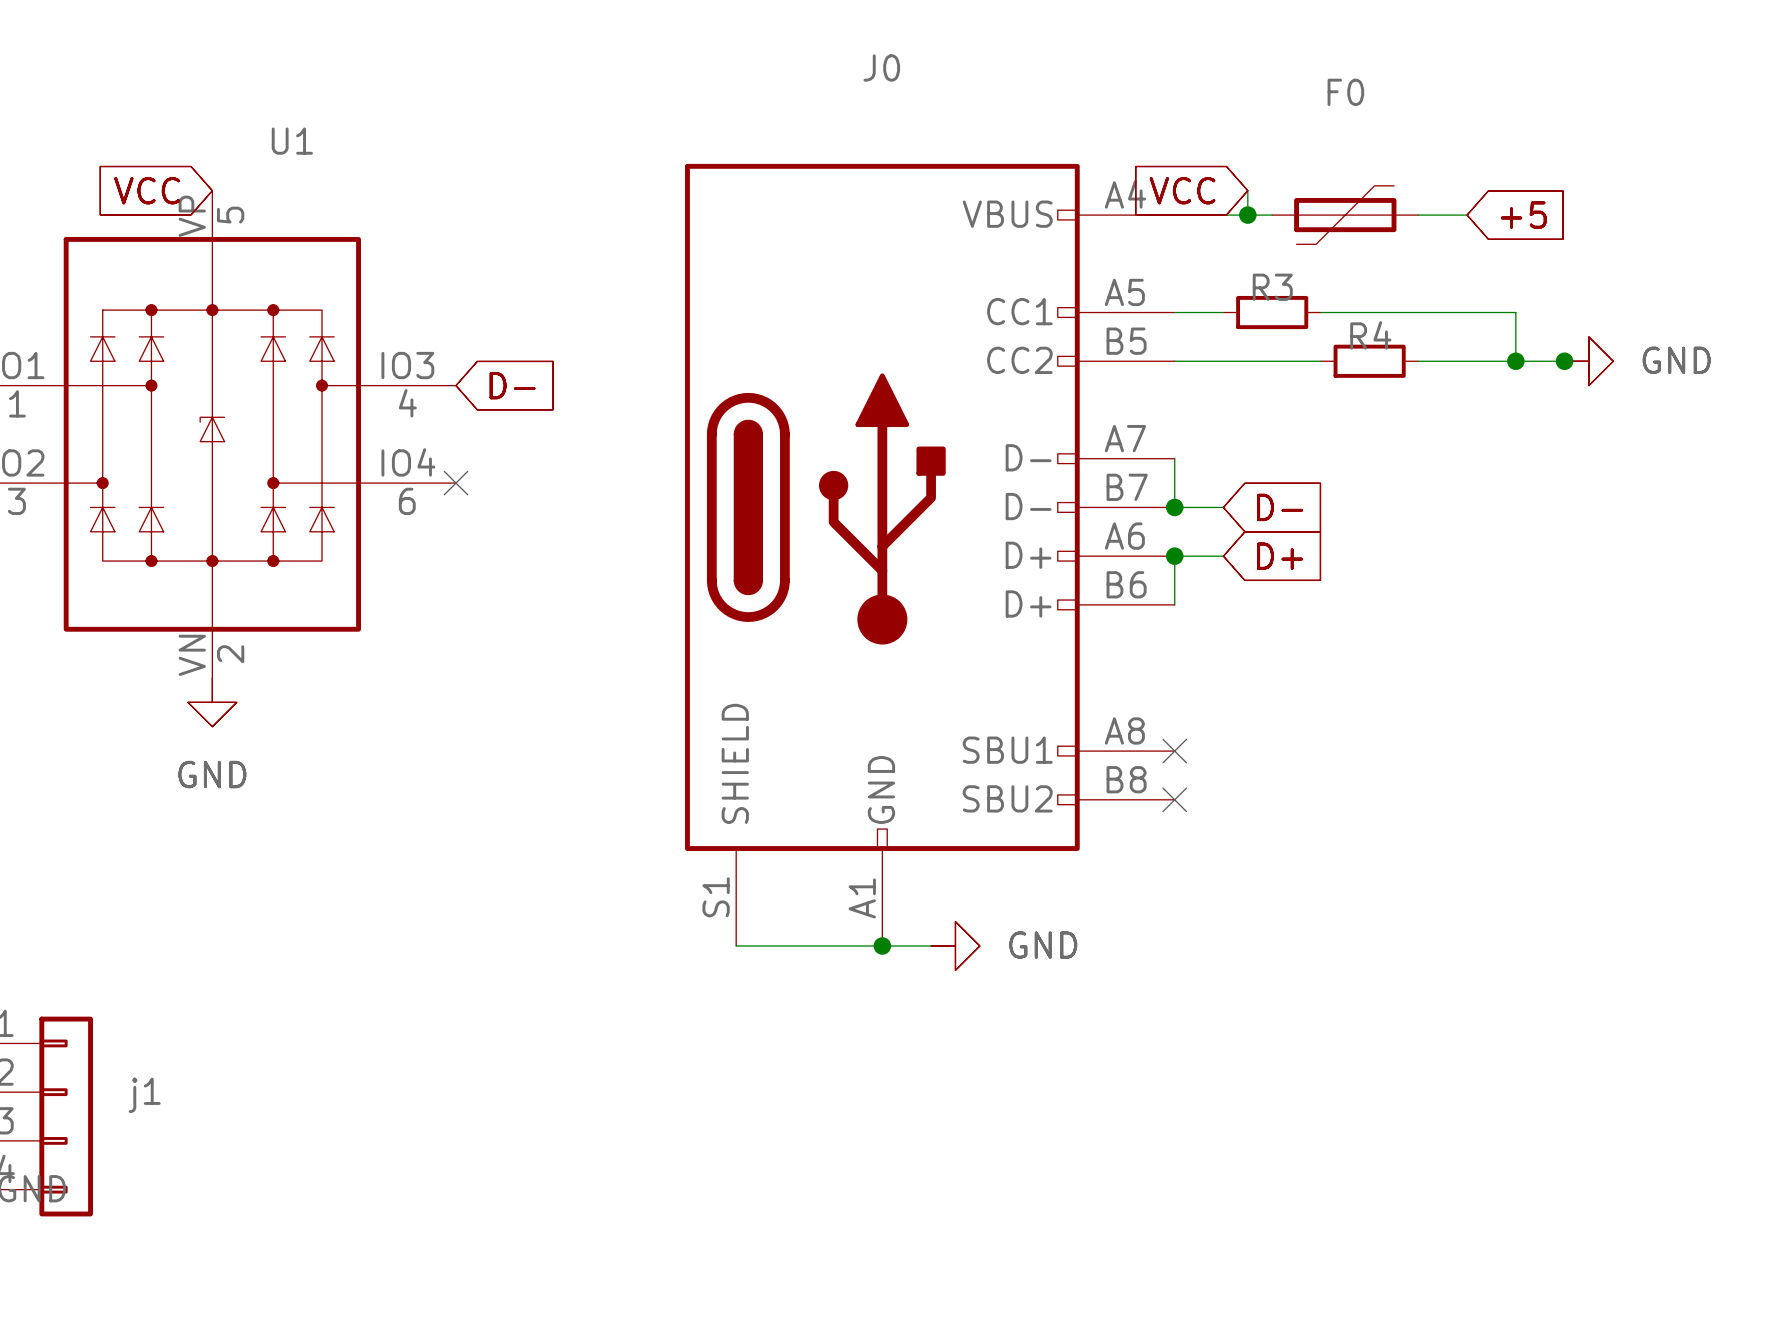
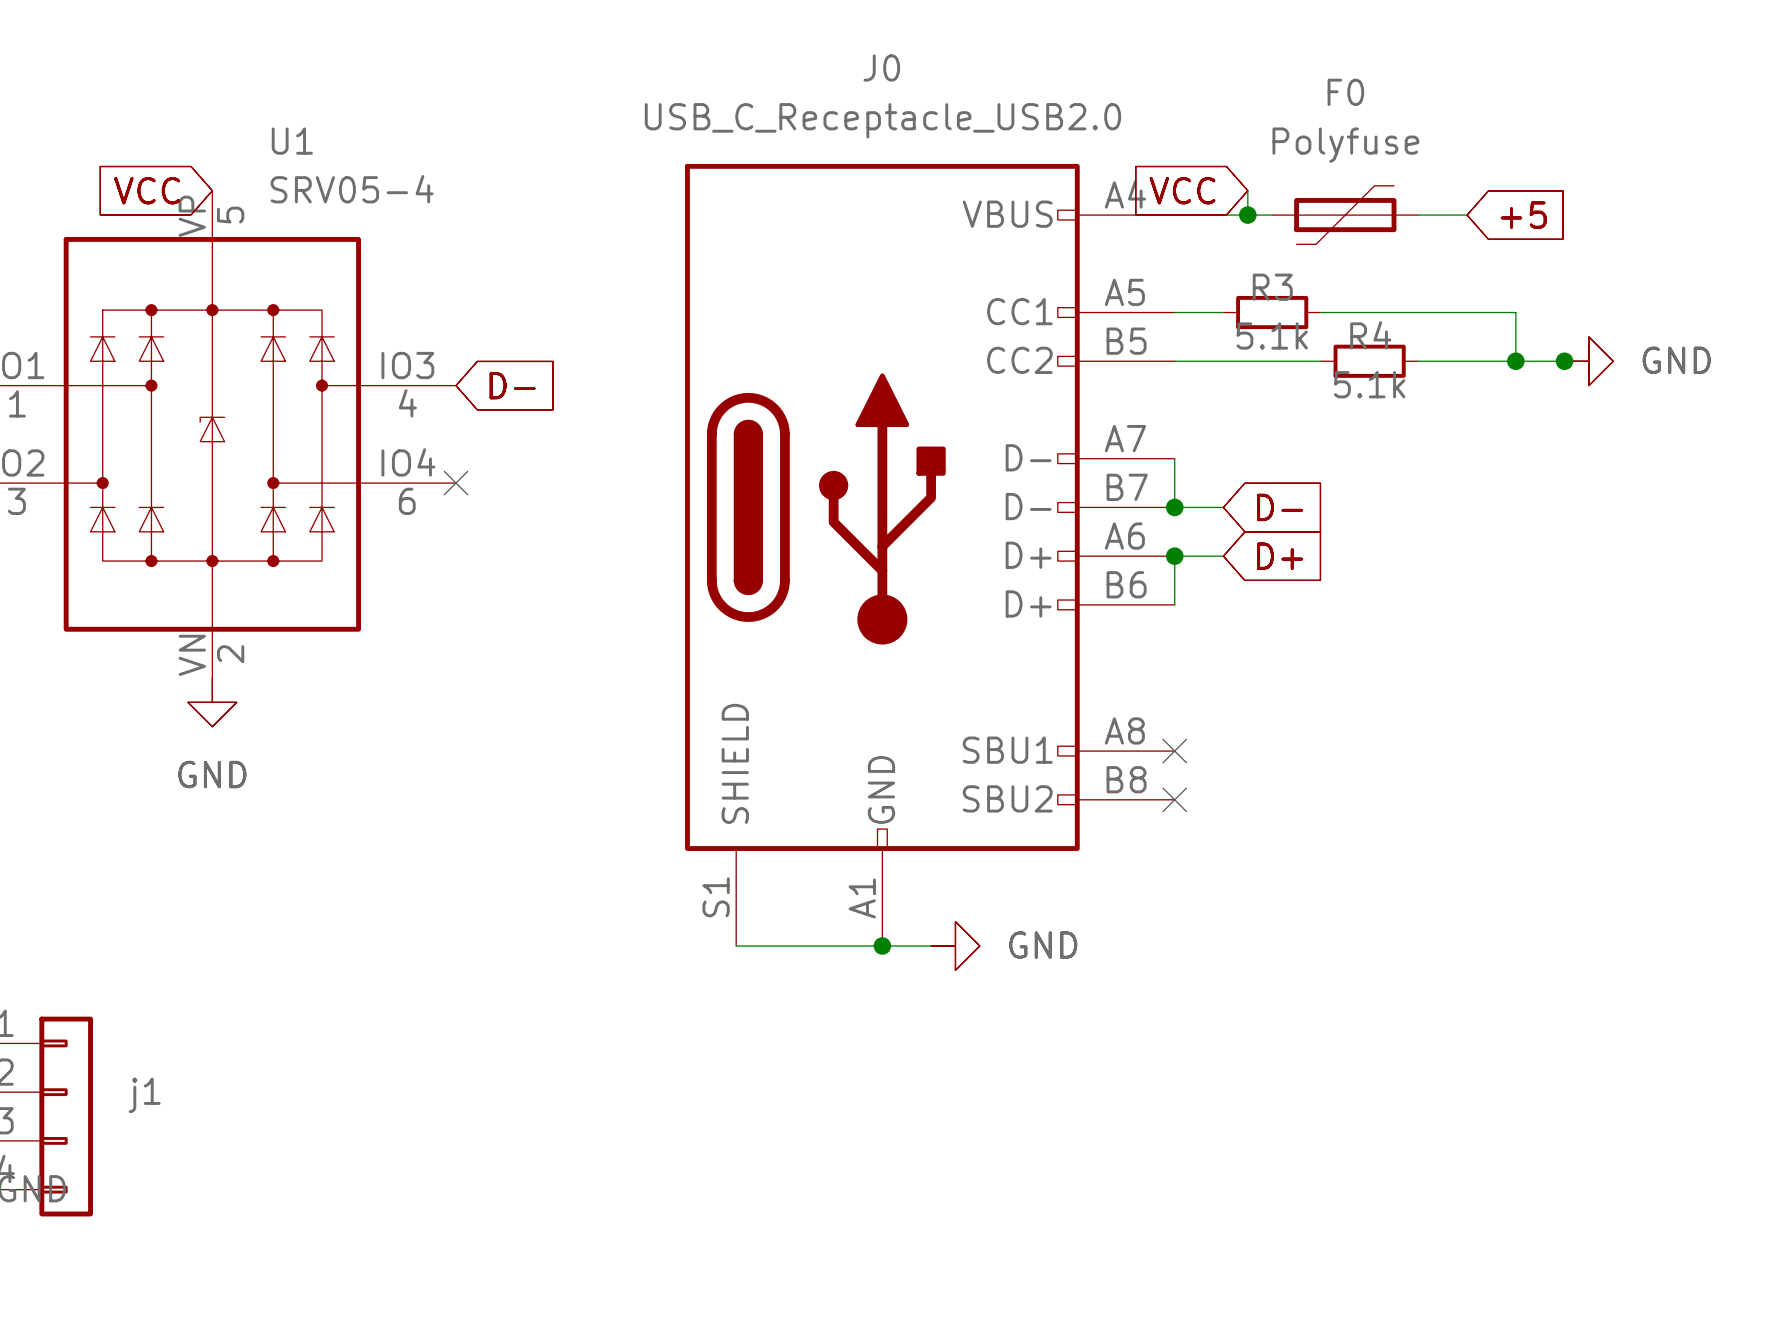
J0 value: none -> USB_C_Receptacle_USB2.0 (882, 120)
F0 value: none -> Polyfuse (1345, 145)
U1 value: none -> SRV05-4 (352, 189)
R3 value: none -> 5.1k (1272, 335)
R4 value: none -> 5.1k (1369, 384)

